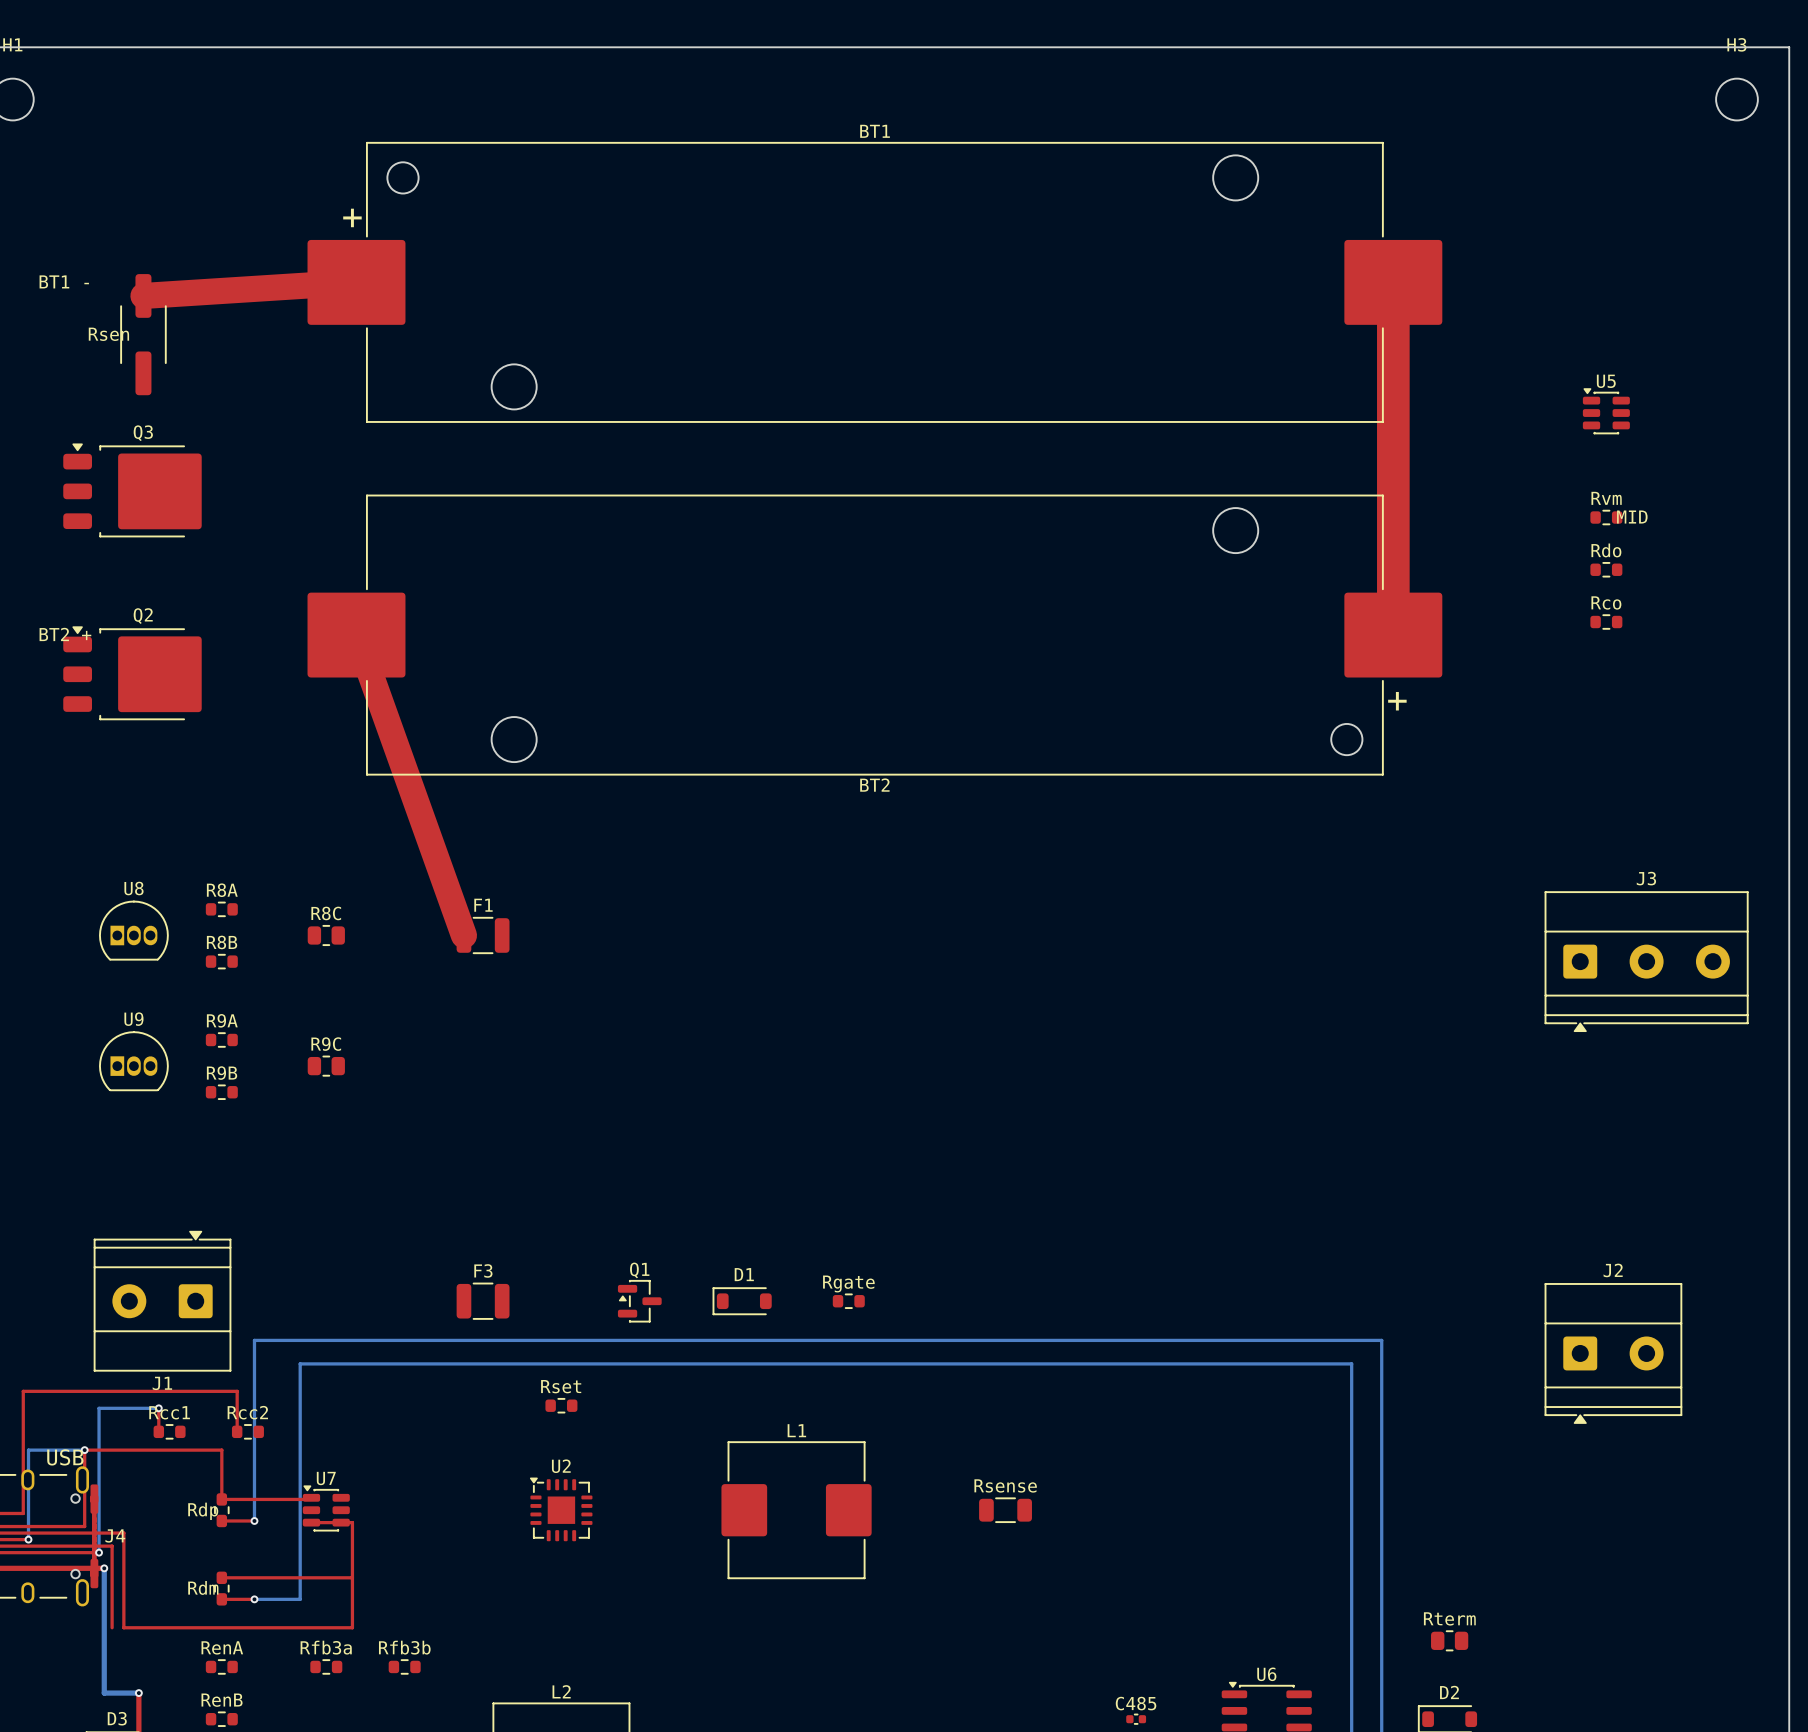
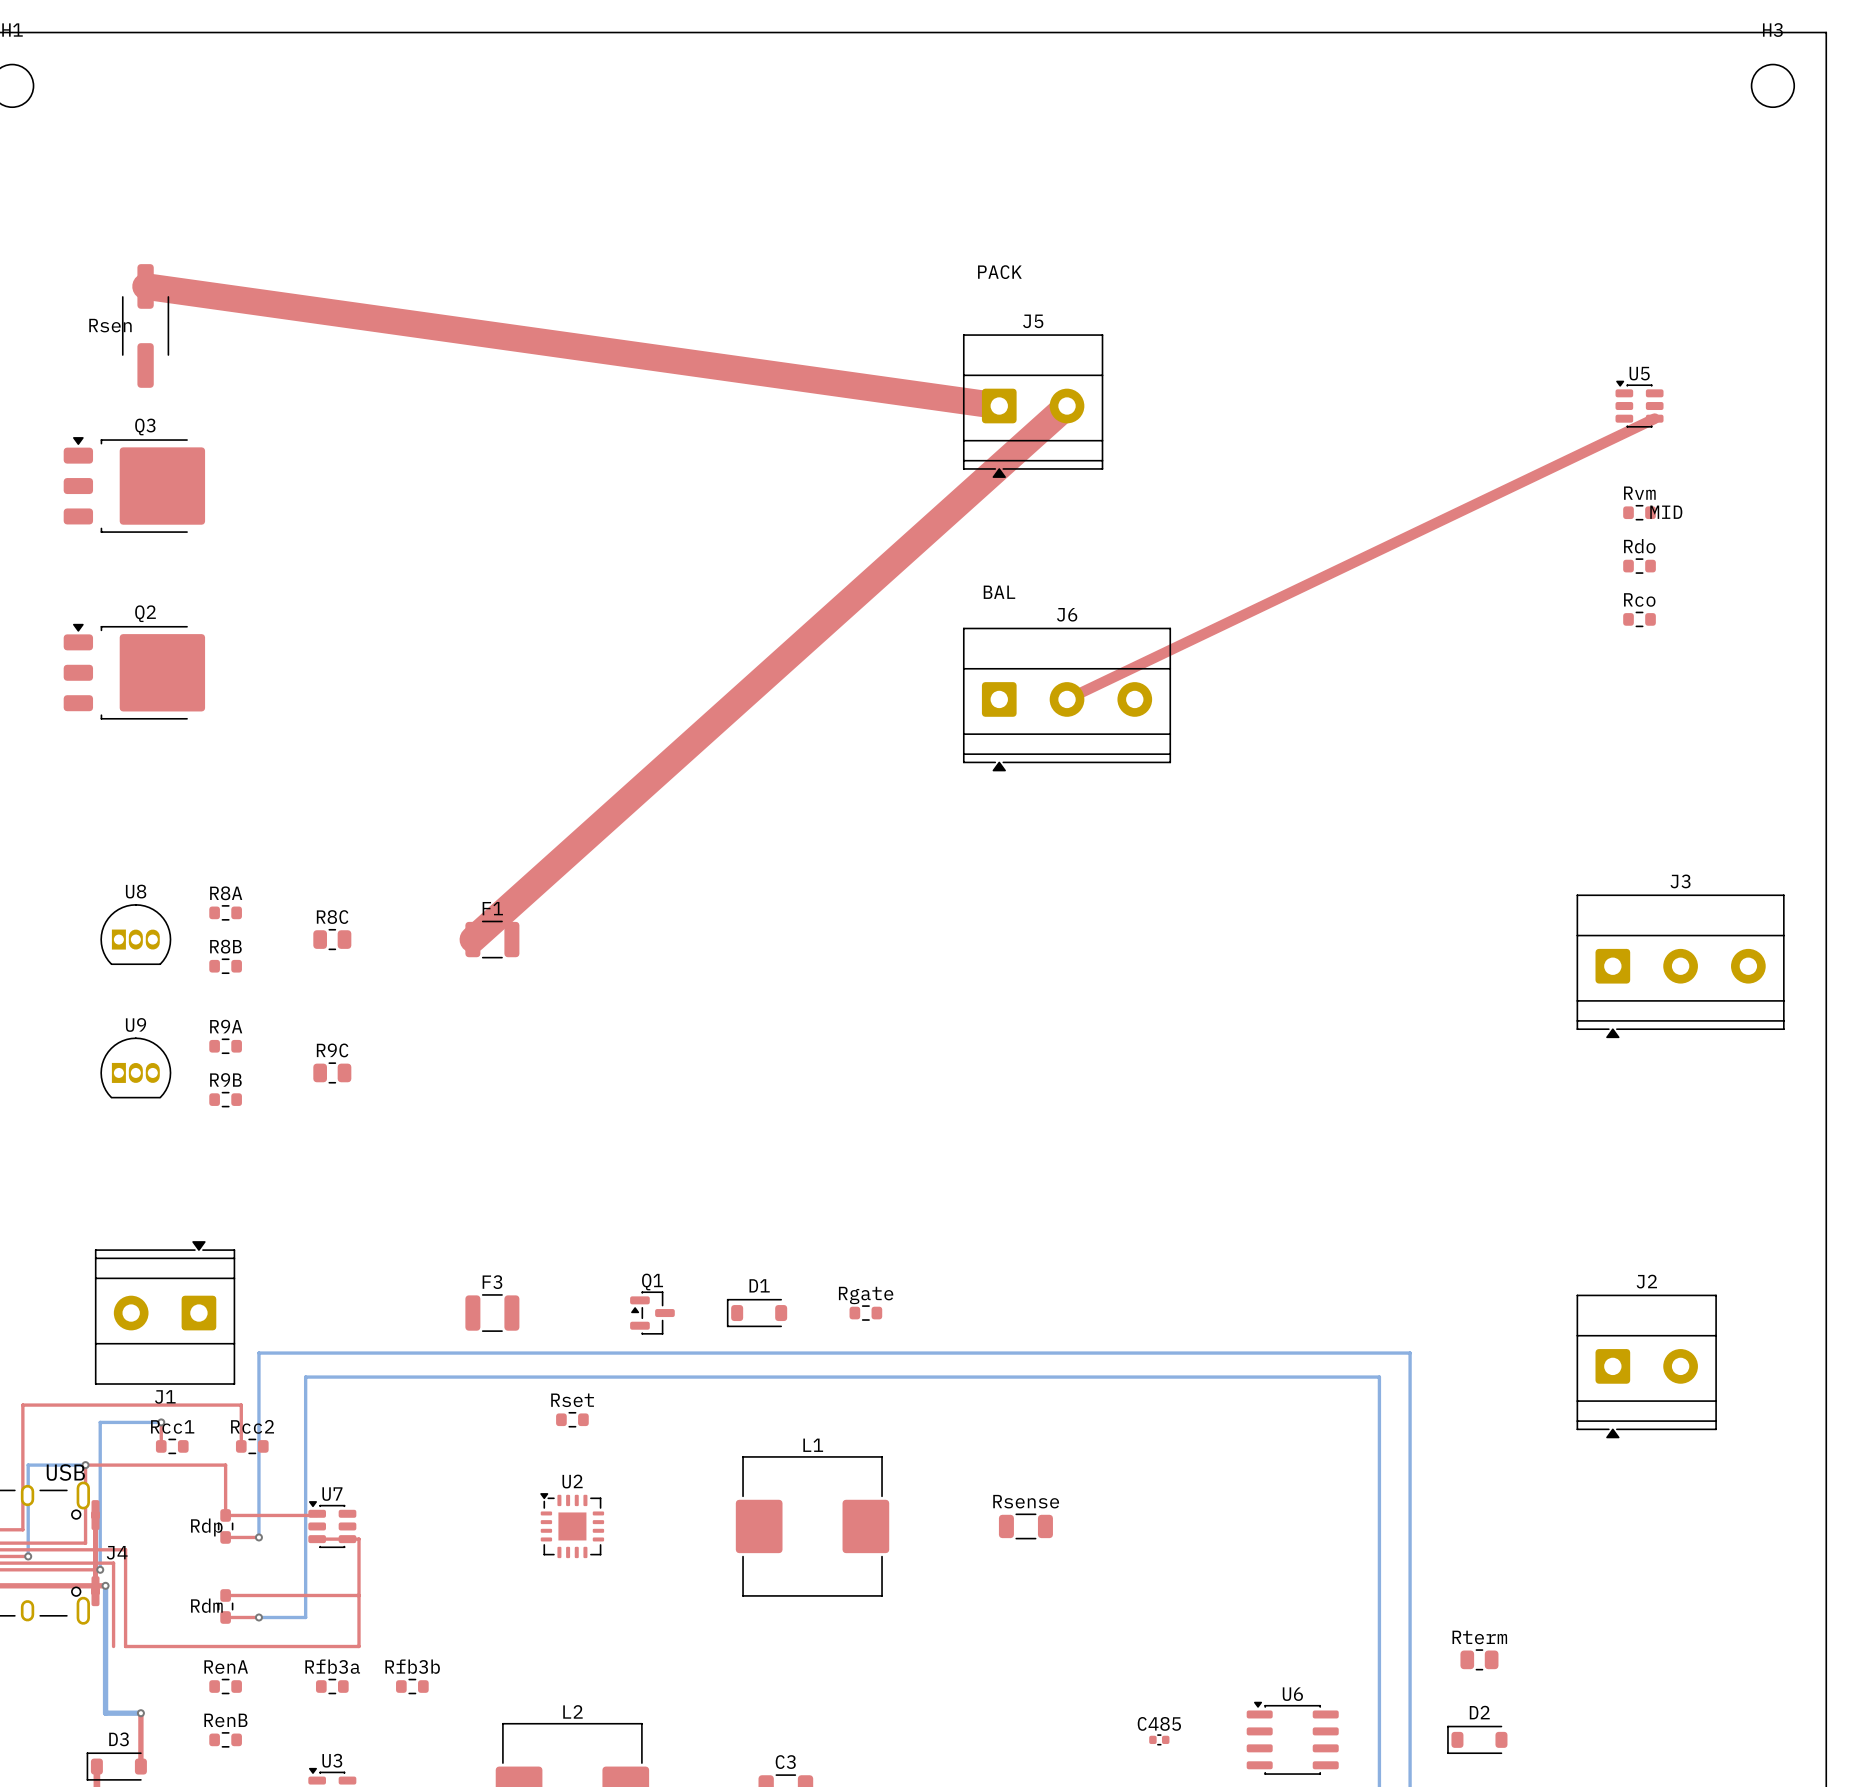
text: BT1 - (64, 281) -> none
text: none -> PACK (999, 272)
top track: (356, 282) (143, 295) -> (999, 406) (145, 286)
BT1: (874, 282) -> none
top track: (1393, 282) (1393, 635) -> none
J5: none -> (1033, 406)
top track: none -> (1654, 418) (1067, 699)
text: none -> BAL (999, 592)
text: BT2 + (65, 634) -> none
top track: (356, 635) (463, 935) -> (1067, 406) (472, 939)
BT2: (874, 635) -> none
J6: none -> (1067, 699)

